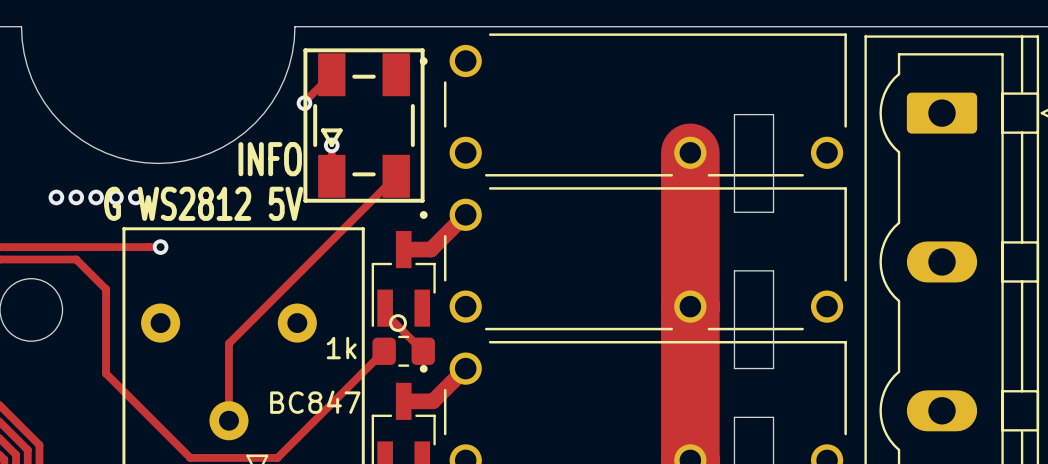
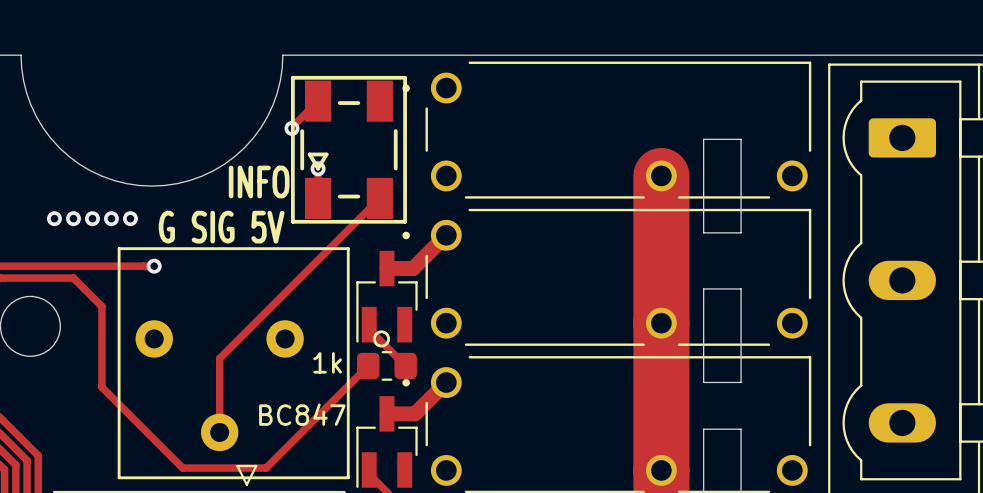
text: G WS2812 5V (203, 203) -> G SIG 5V (221, 227)

